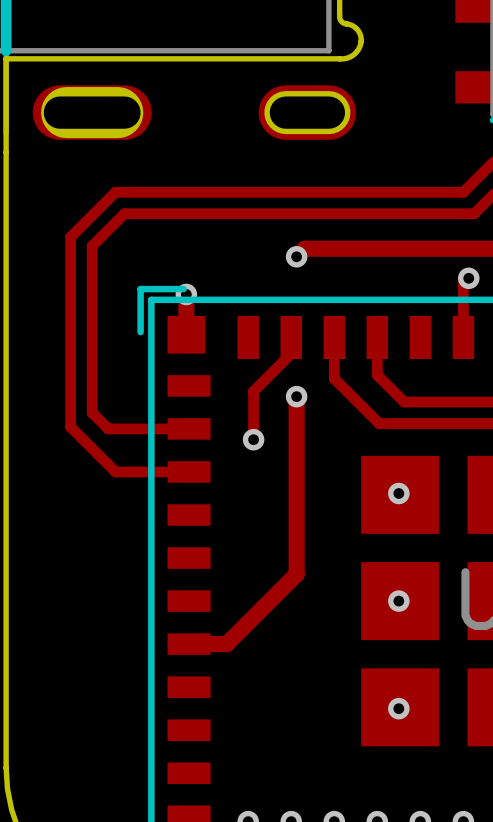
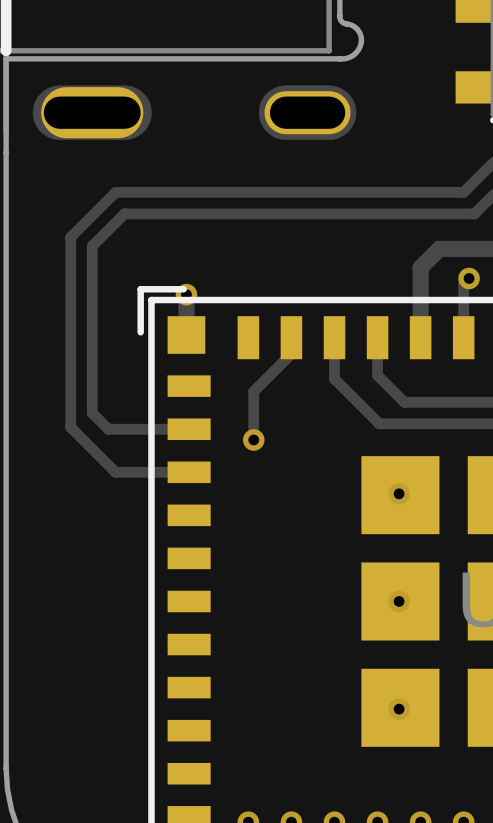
track: (439, 248) (304, 248) (296, 256) -> (439, 248) (420, 267) (420, 337)
via: (296, 256) -> none
track: (296, 396) (296, 574) (226, 644) (189, 644) -> none
via: (296, 396) -> none

